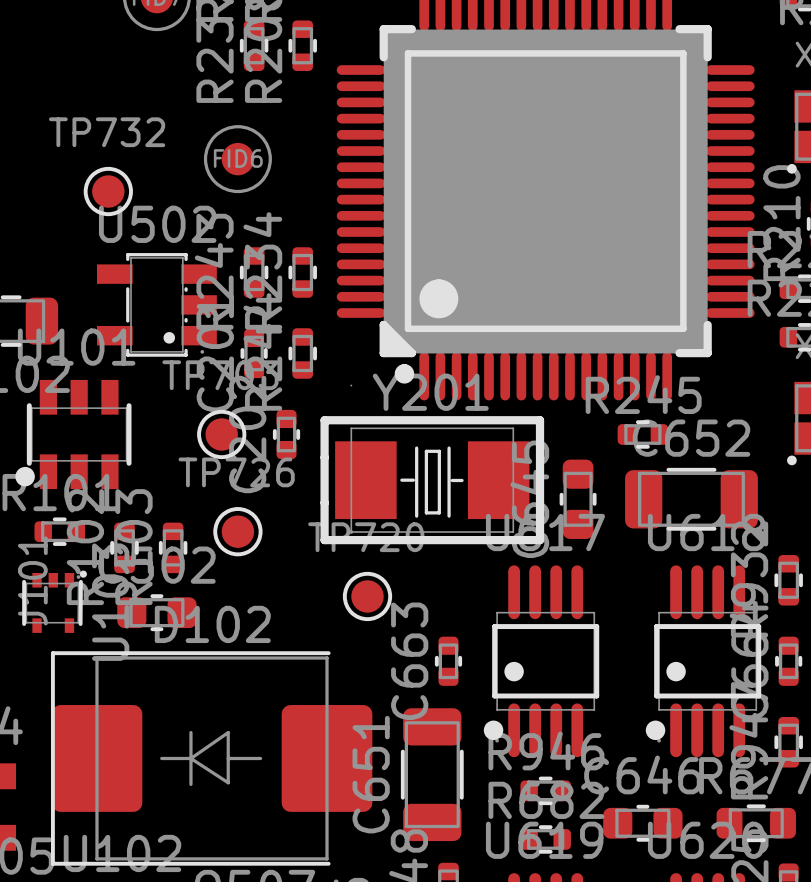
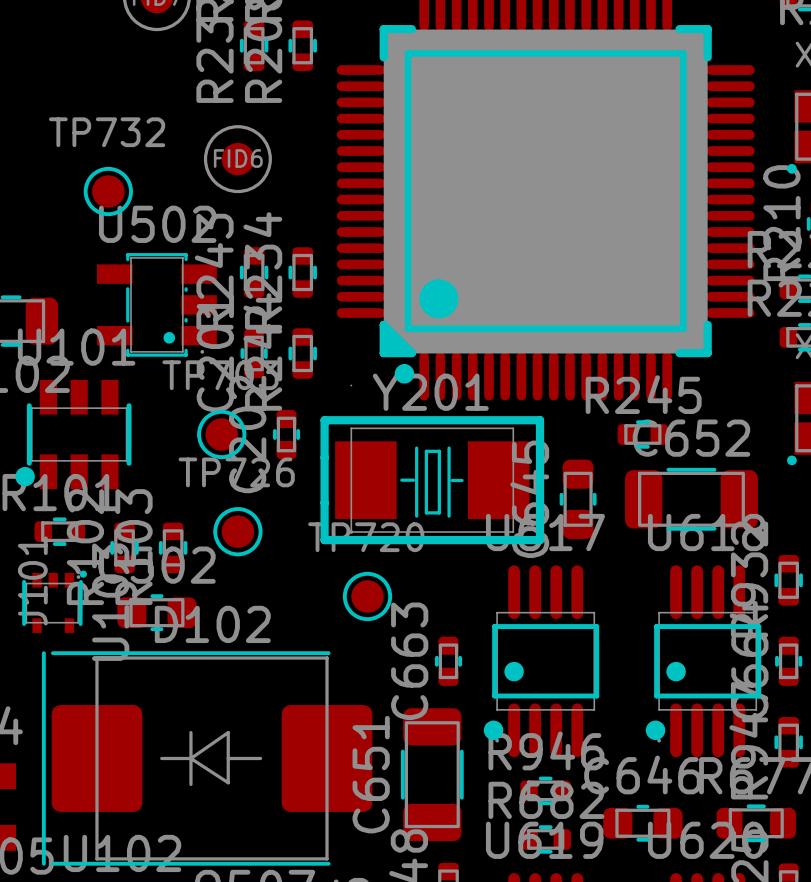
D102 footprint: [50, 651, 373, 866] -> [41, 651, 373, 866]

